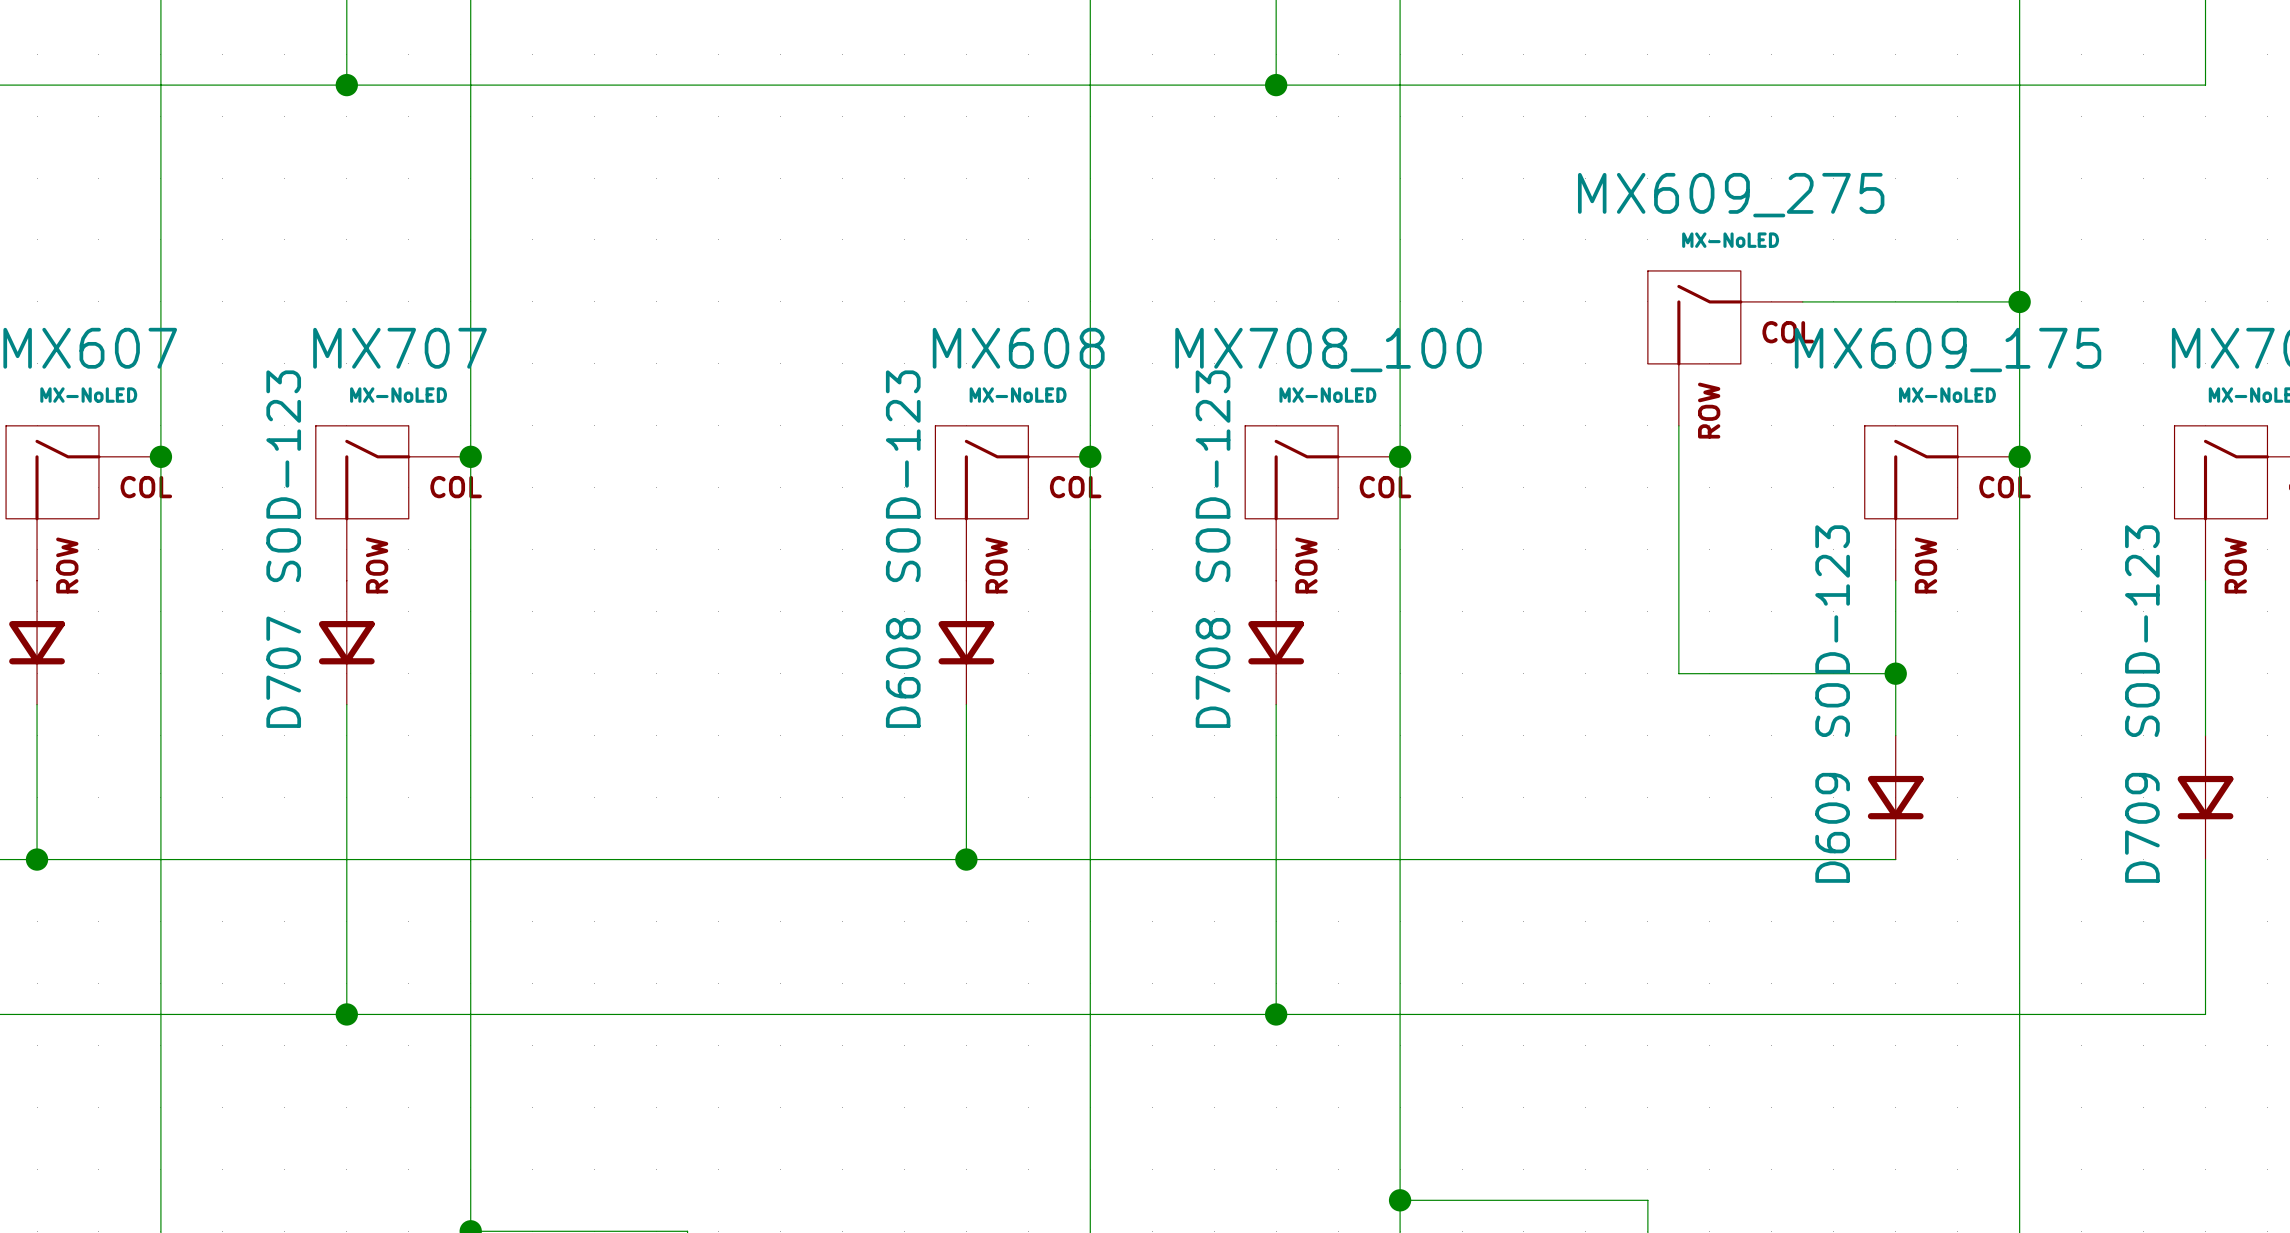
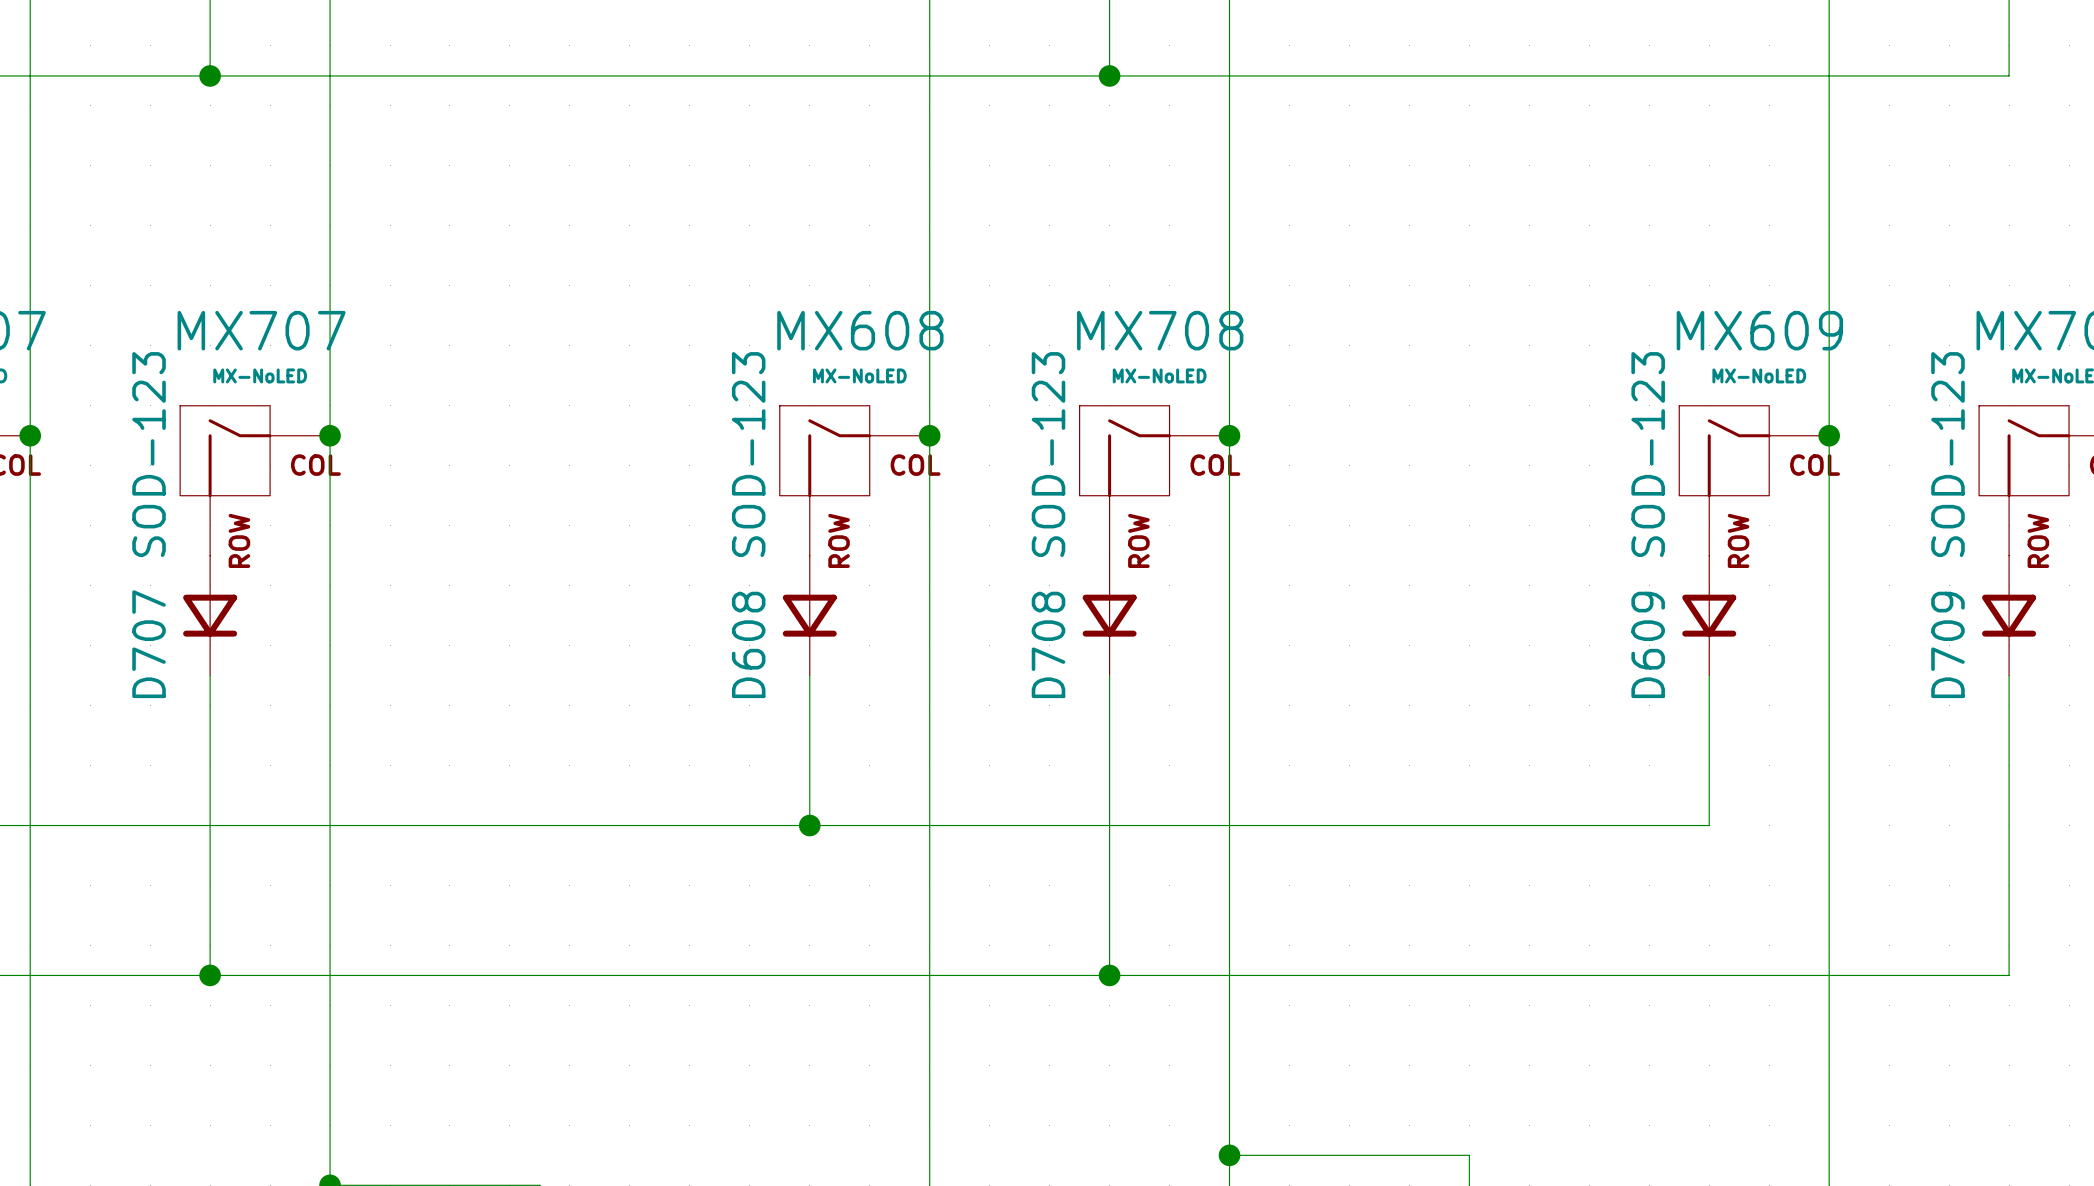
wire: (1802, 301) (2019, 301) -> none
junction: (2019, 301) -> none
MX609_275: MX-NoLED (1725, 348) -> none
MX708_100 name: MX708_100 (1328, 350) -> MX708 (1160, 330)
MX609_175 name: MX609_175 (1948, 350) -> MX609 (1759, 330)
wire: (1678, 425) (1678, 673) (1895, 673) -> none
junction: (1895, 673) -> none
D609 position: (1895, 797) -> (1709, 615)
D709 position: (2205, 797) -> (2009, 615)

